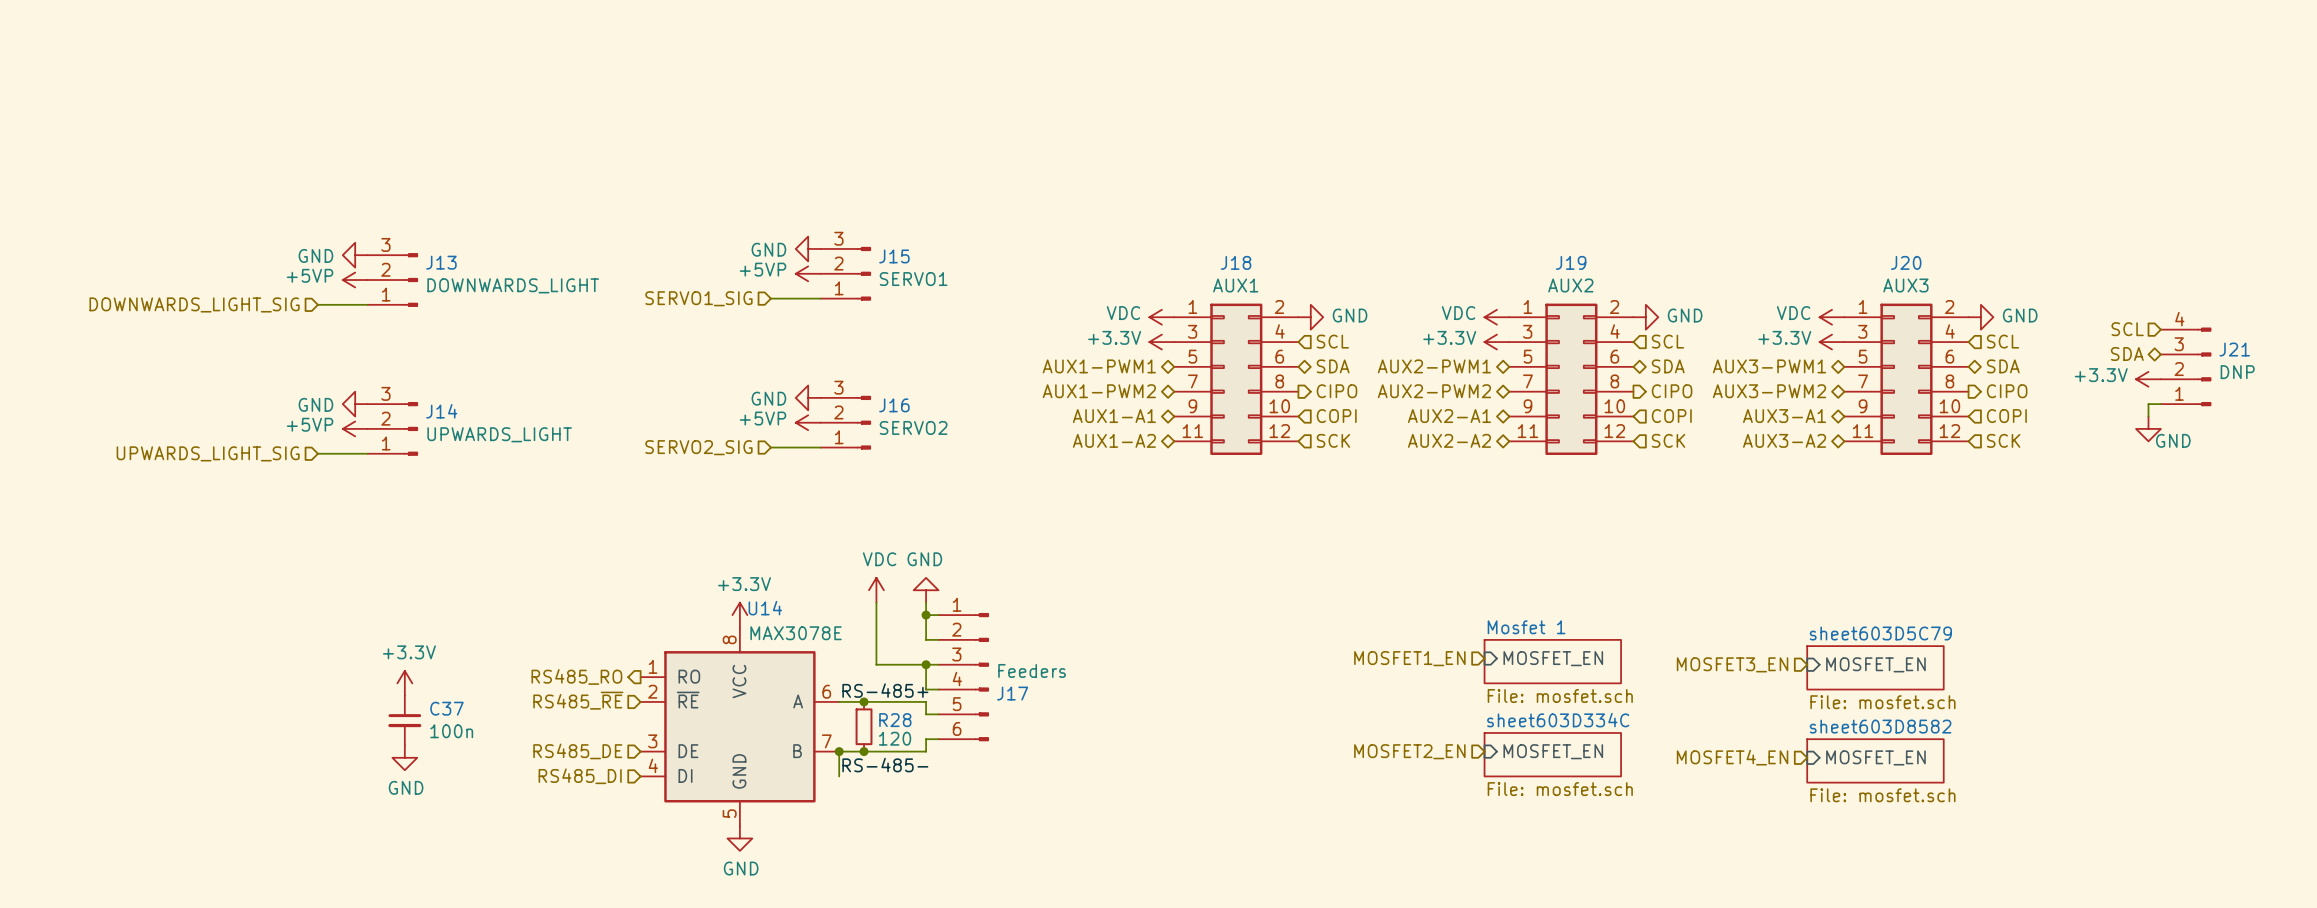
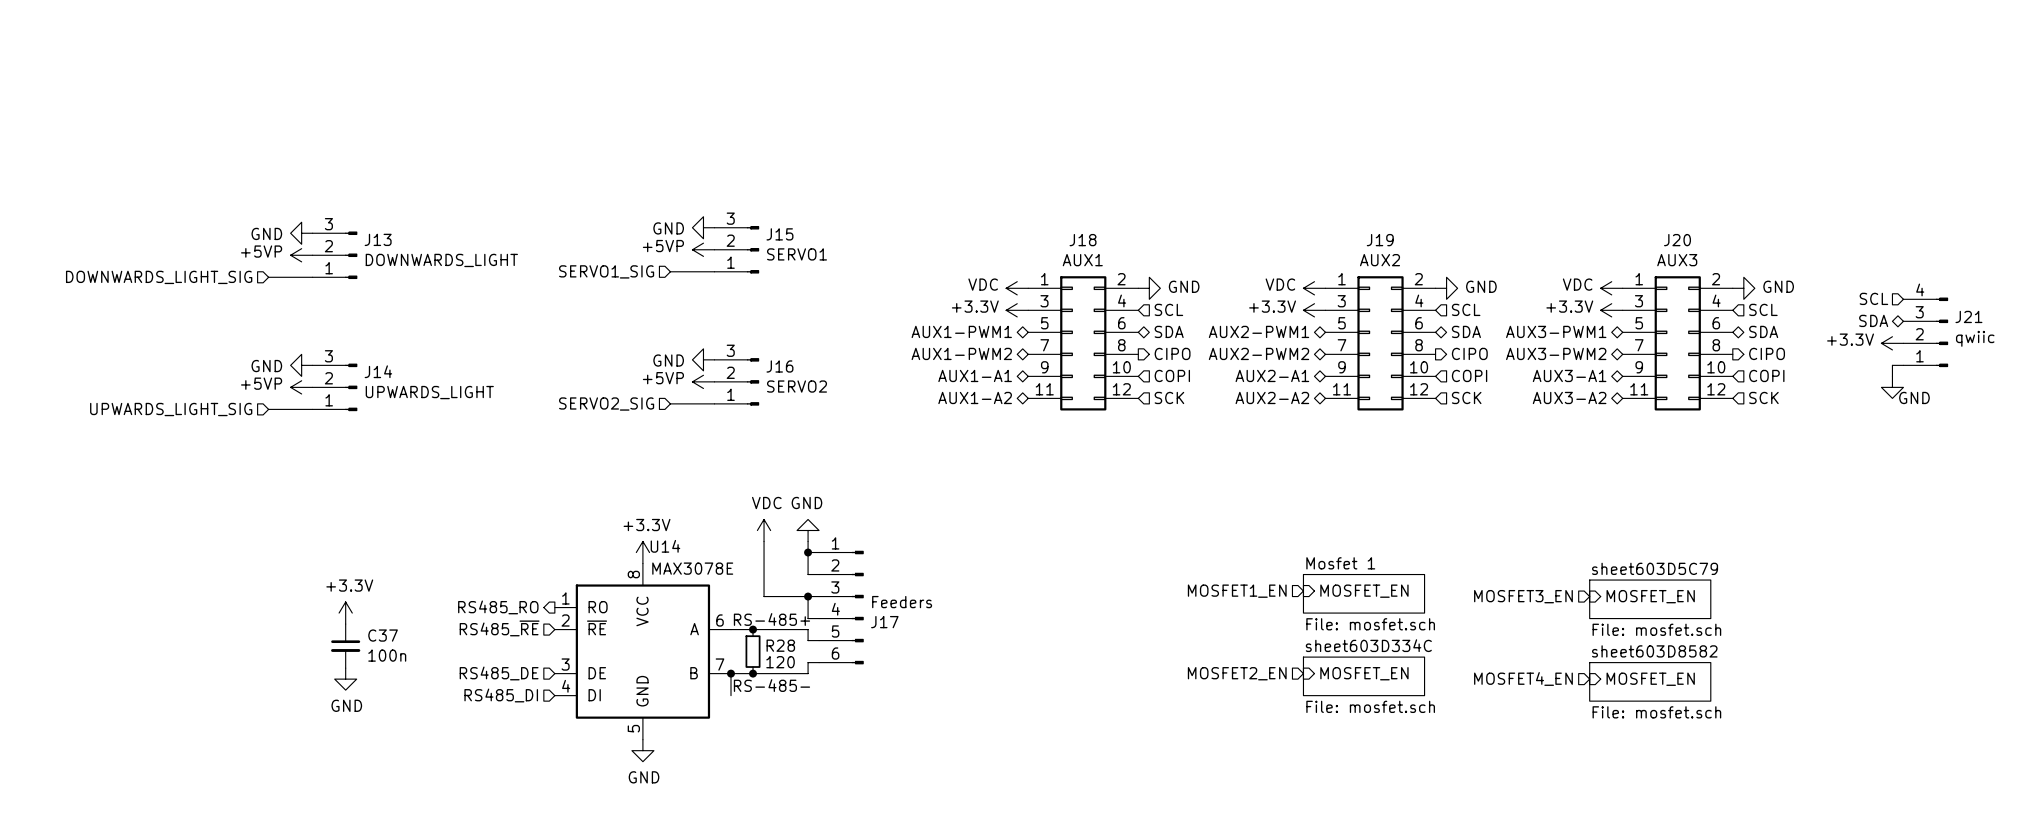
J21 value: DNP (2237, 372) -> qwiic (1975, 338)

